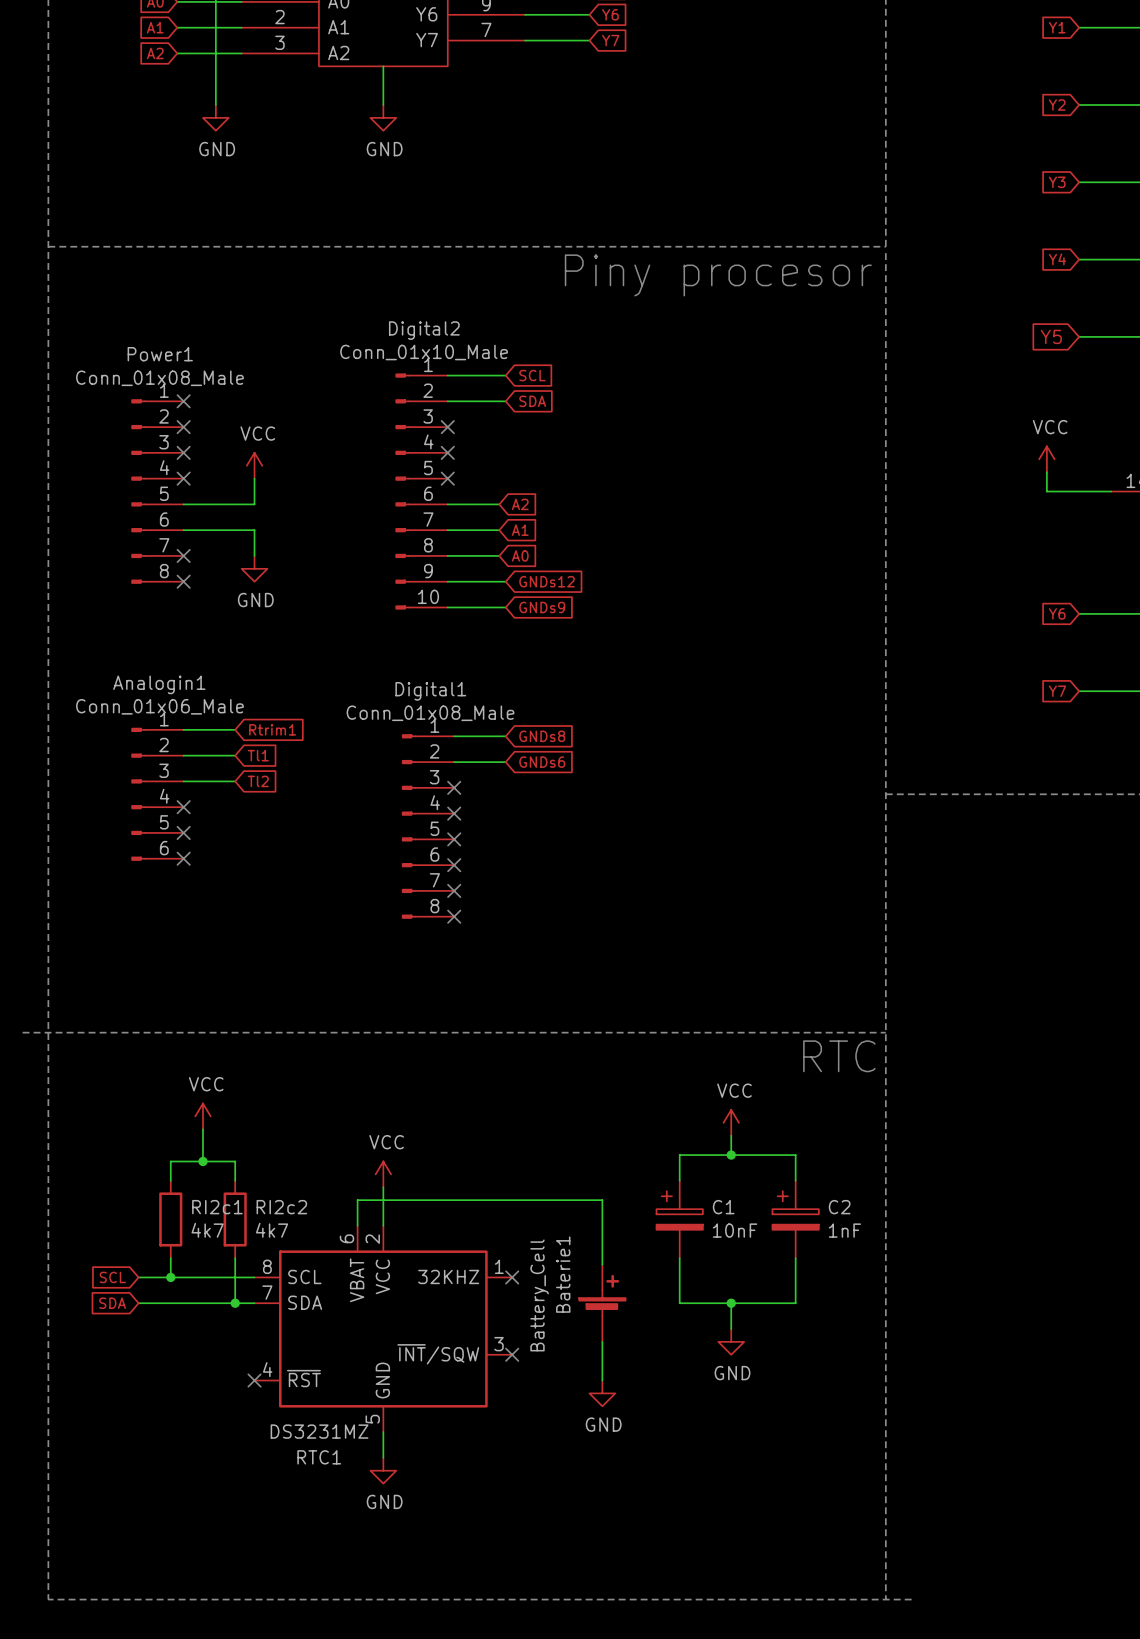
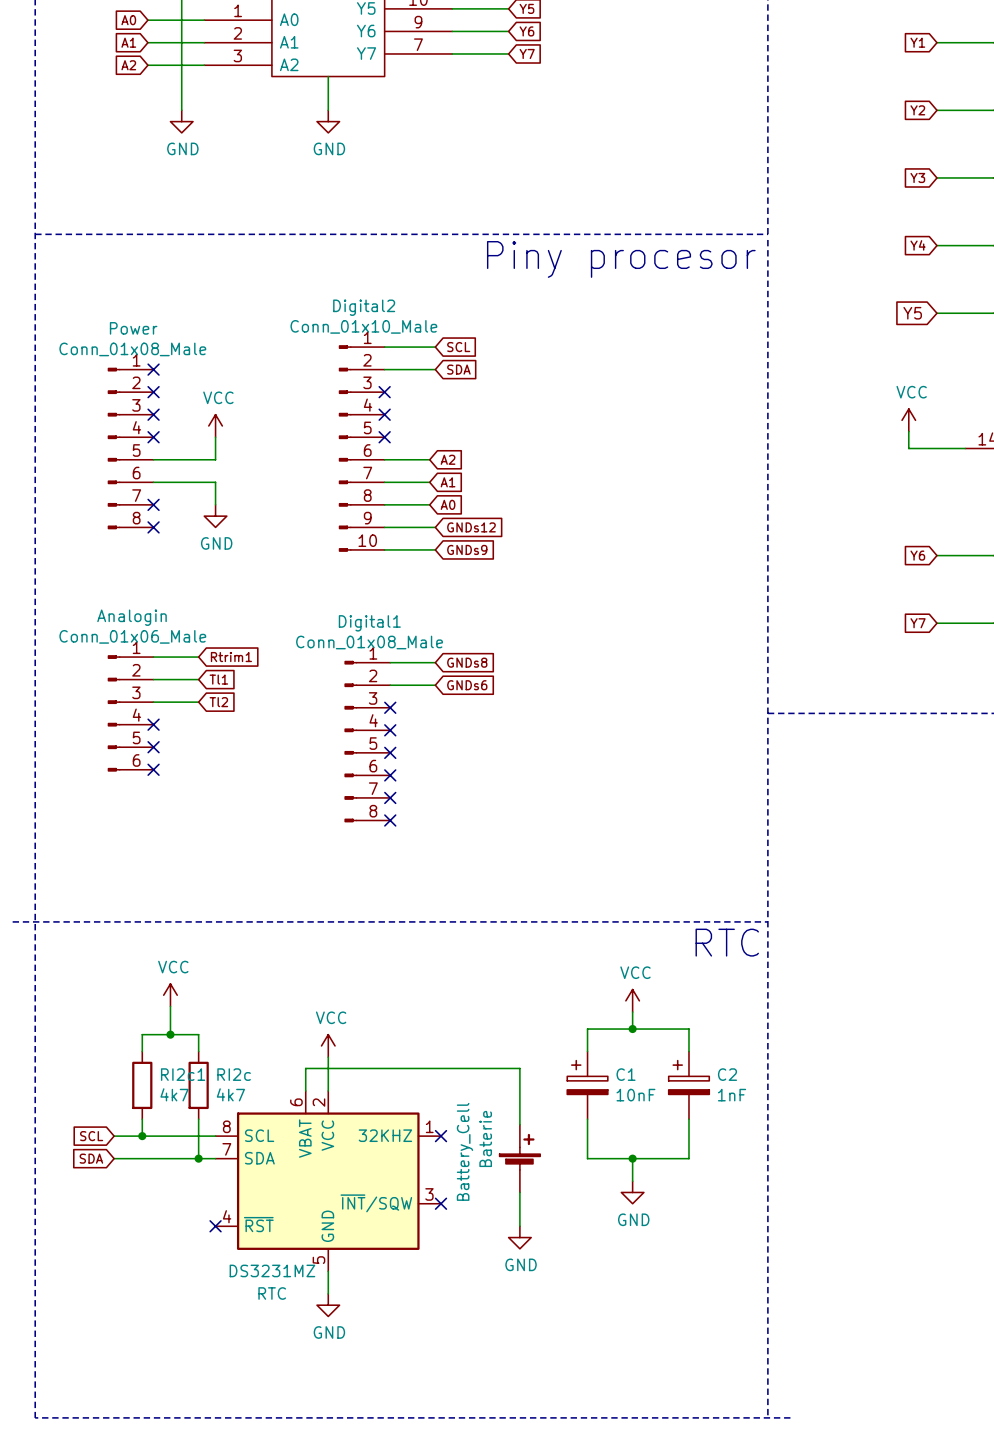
Power1 name: Power1 (160, 354) -> Power (133, 328)
Analogin1 name: Analogin1 (159, 684) -> Analogin (132, 617)
RI2c2 name: RI2c2 (281, 1207) -> RI2c (234, 1074)
Baterie1 name: Baterie1 (563, 1274) -> Baterie (485, 1138)
RTC1 name: RTC1 (319, 1457) -> RTC (272, 1293)

